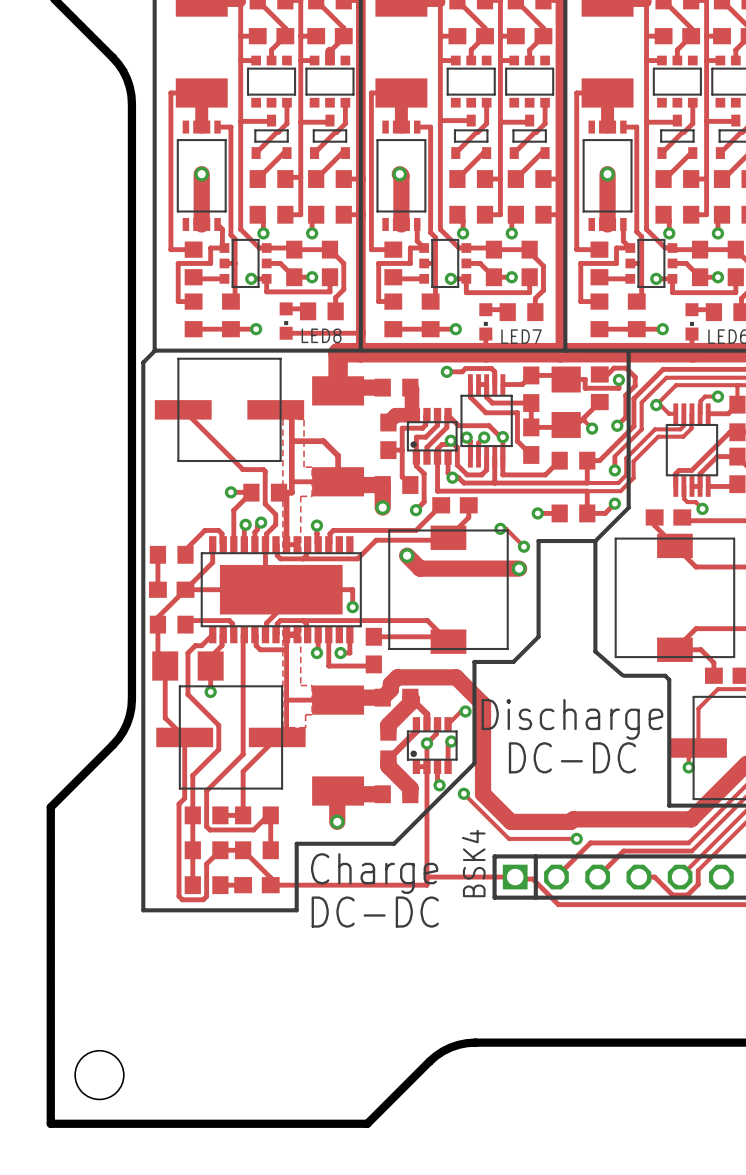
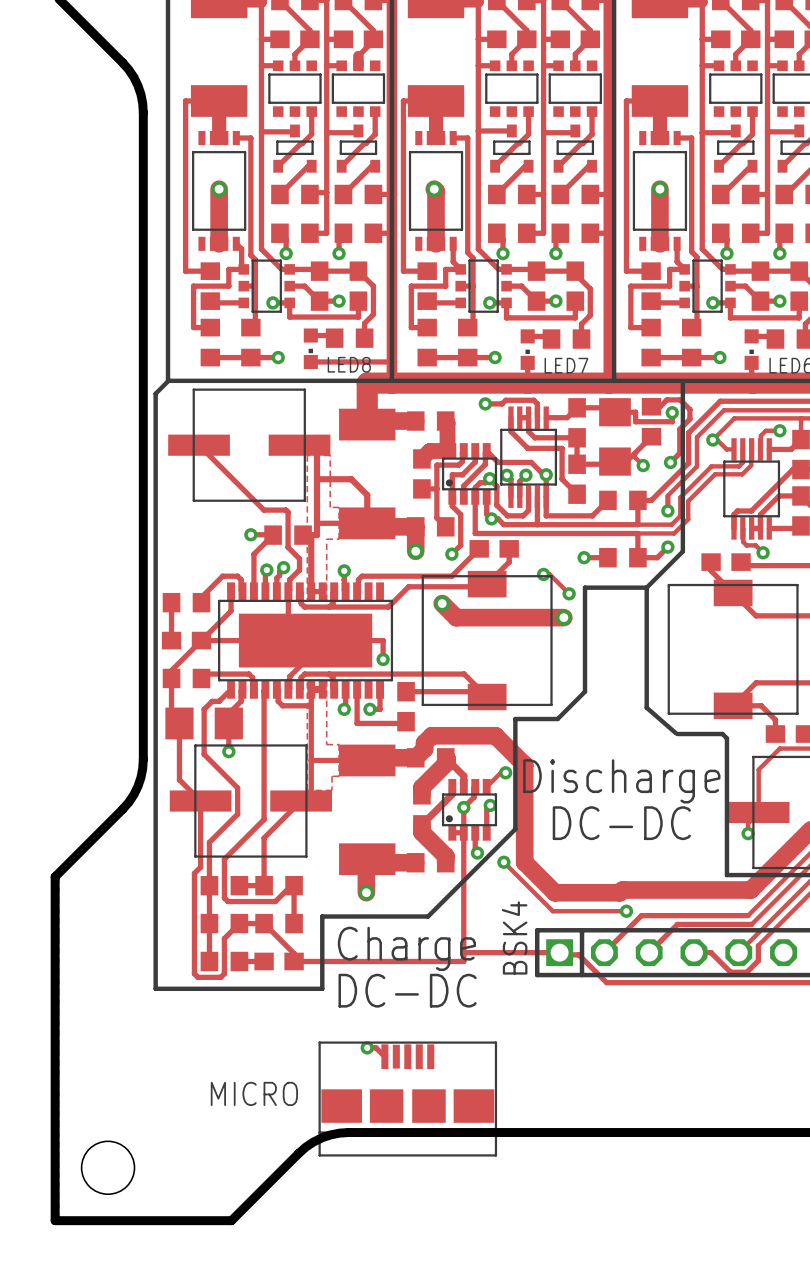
track: none -> (367, 1047) (376, 1047) (384, 1056)
via: none -> (367, 1047)
MICRO: none -> (407, 1099)
board edge: (475, 1042) (458, 1044) (435, 1056) (367, 1123) (213, 1123) -> (516, 1132) (348, 1132) (330, 1134) (305, 1147) (231, 1220)

